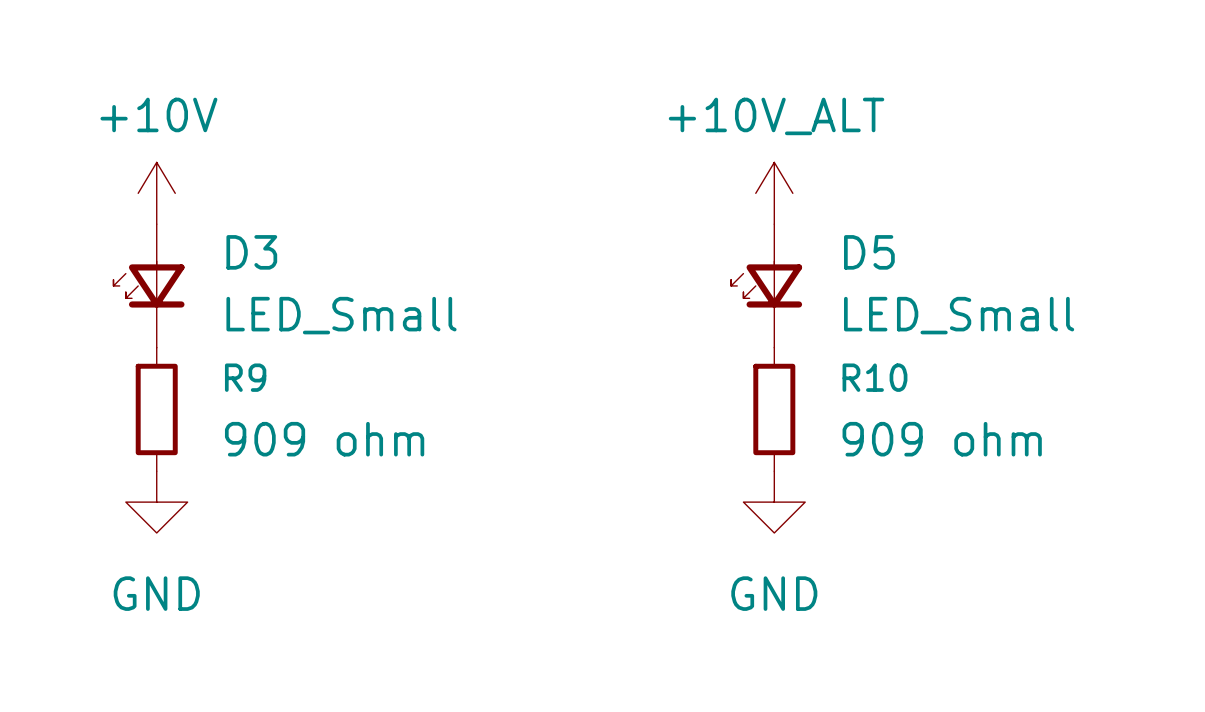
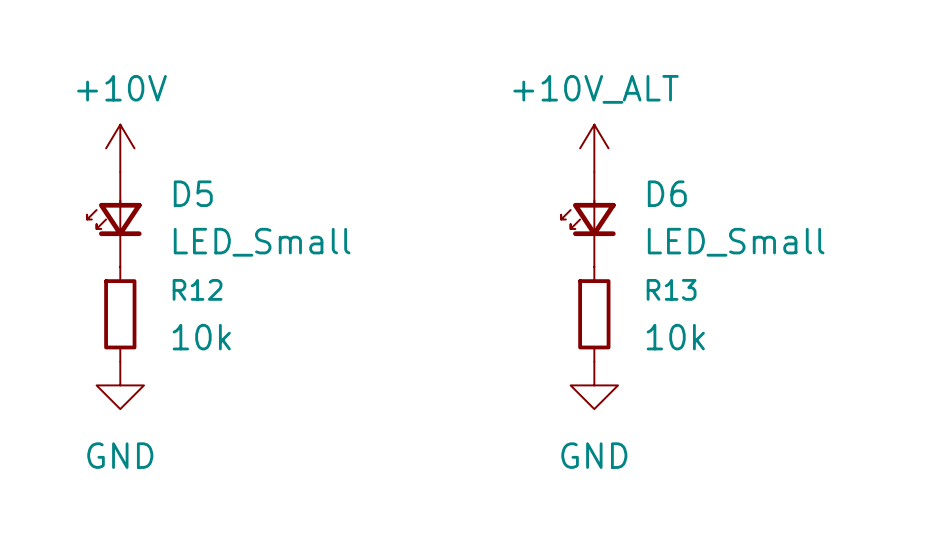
D3 name: D3 (251, 252) -> D5 (193, 193)
D5 name: D5 (869, 252) -> D6 (667, 193)
R9 name: R9 (245, 377) -> R12 (197, 289)
R10 name: R10 (874, 377) -> R13 (671, 289)
R9 value: 909 ohm (324, 439) -> 10k (201, 337)
R10 value: 909 ohm (942, 439) -> 10k (675, 337)

